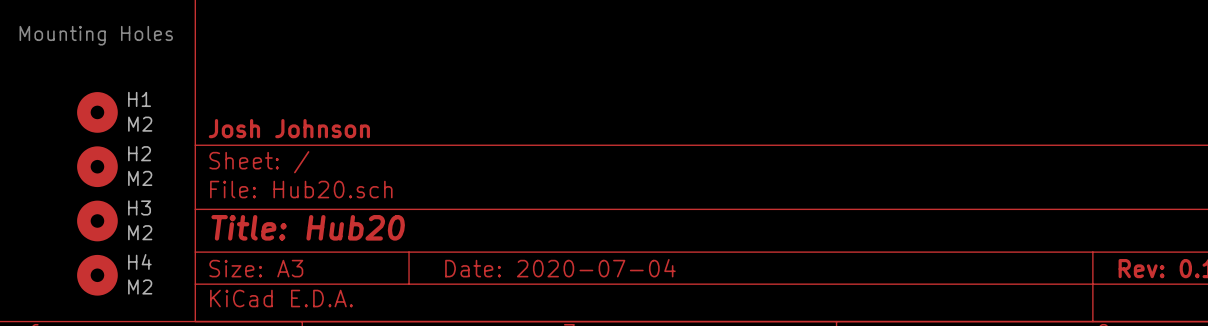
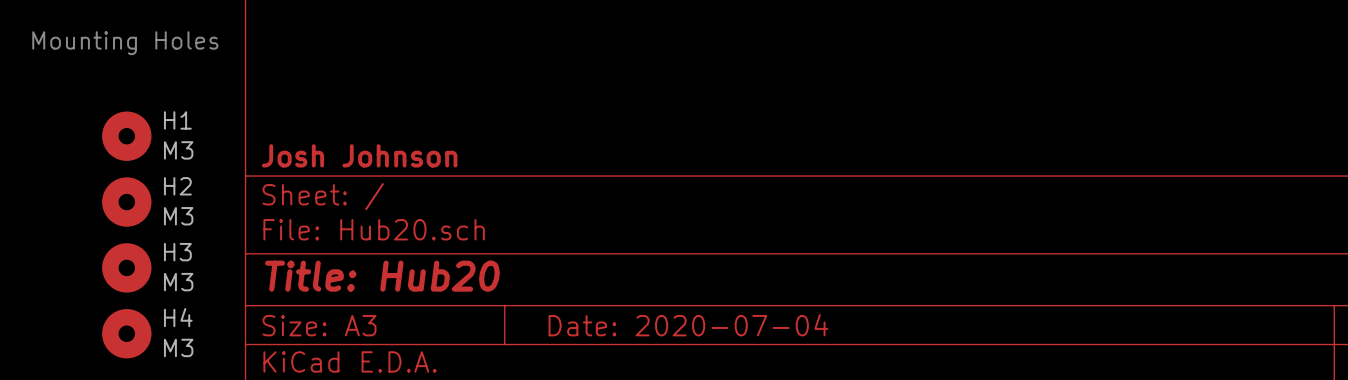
H1 value: M2 (140, 124) -> M3 (178, 150)
H2 value: M2 (140, 178) -> M3 (178, 216)
H3 value: M2 (140, 232) -> M3 (178, 282)
H4 value: M2 (140, 286) -> M3 (178, 347)

